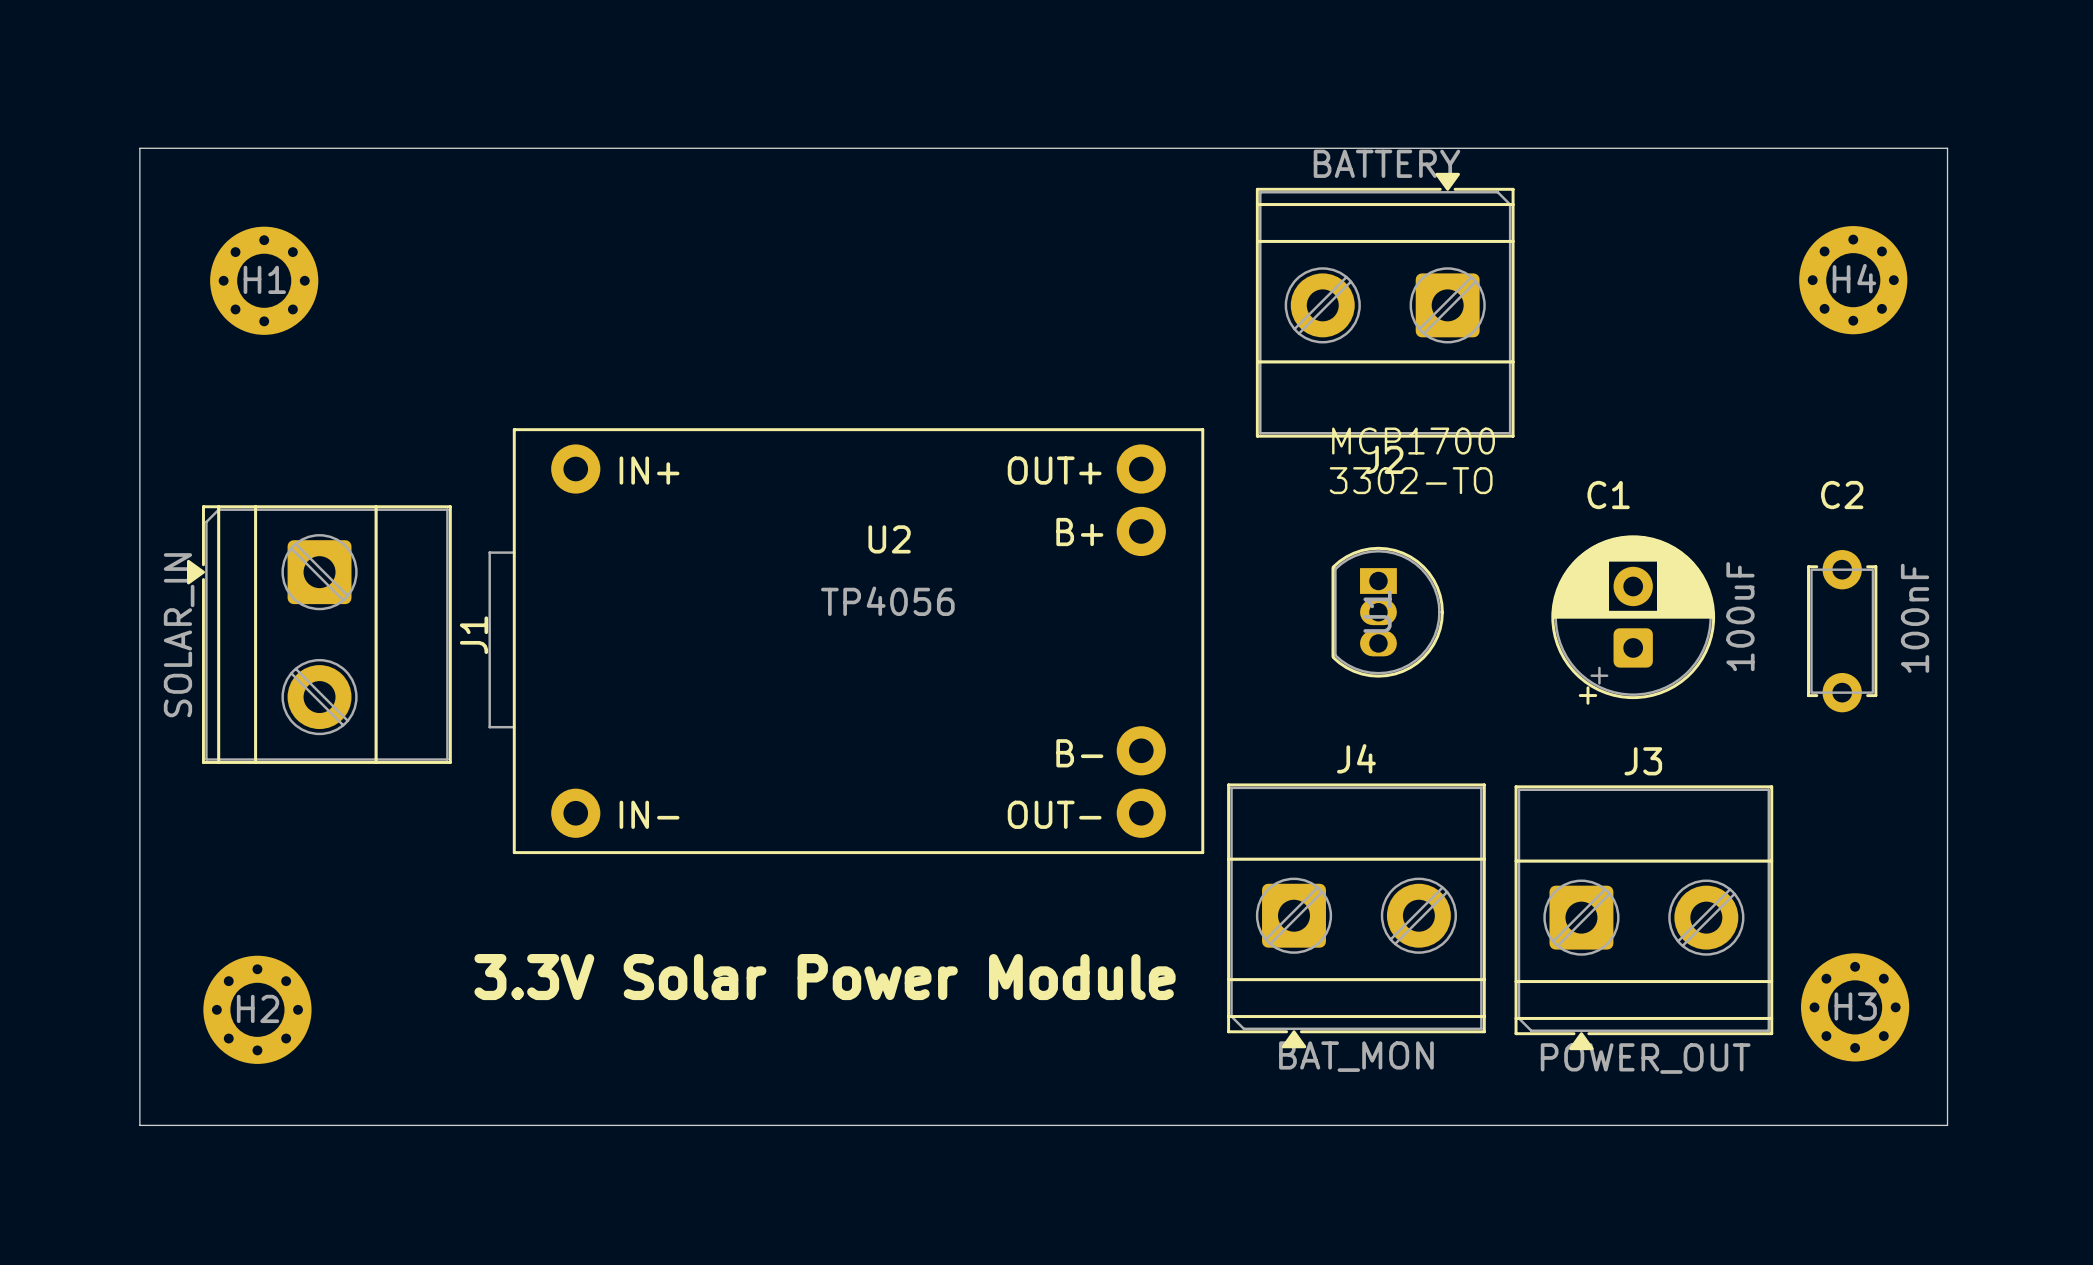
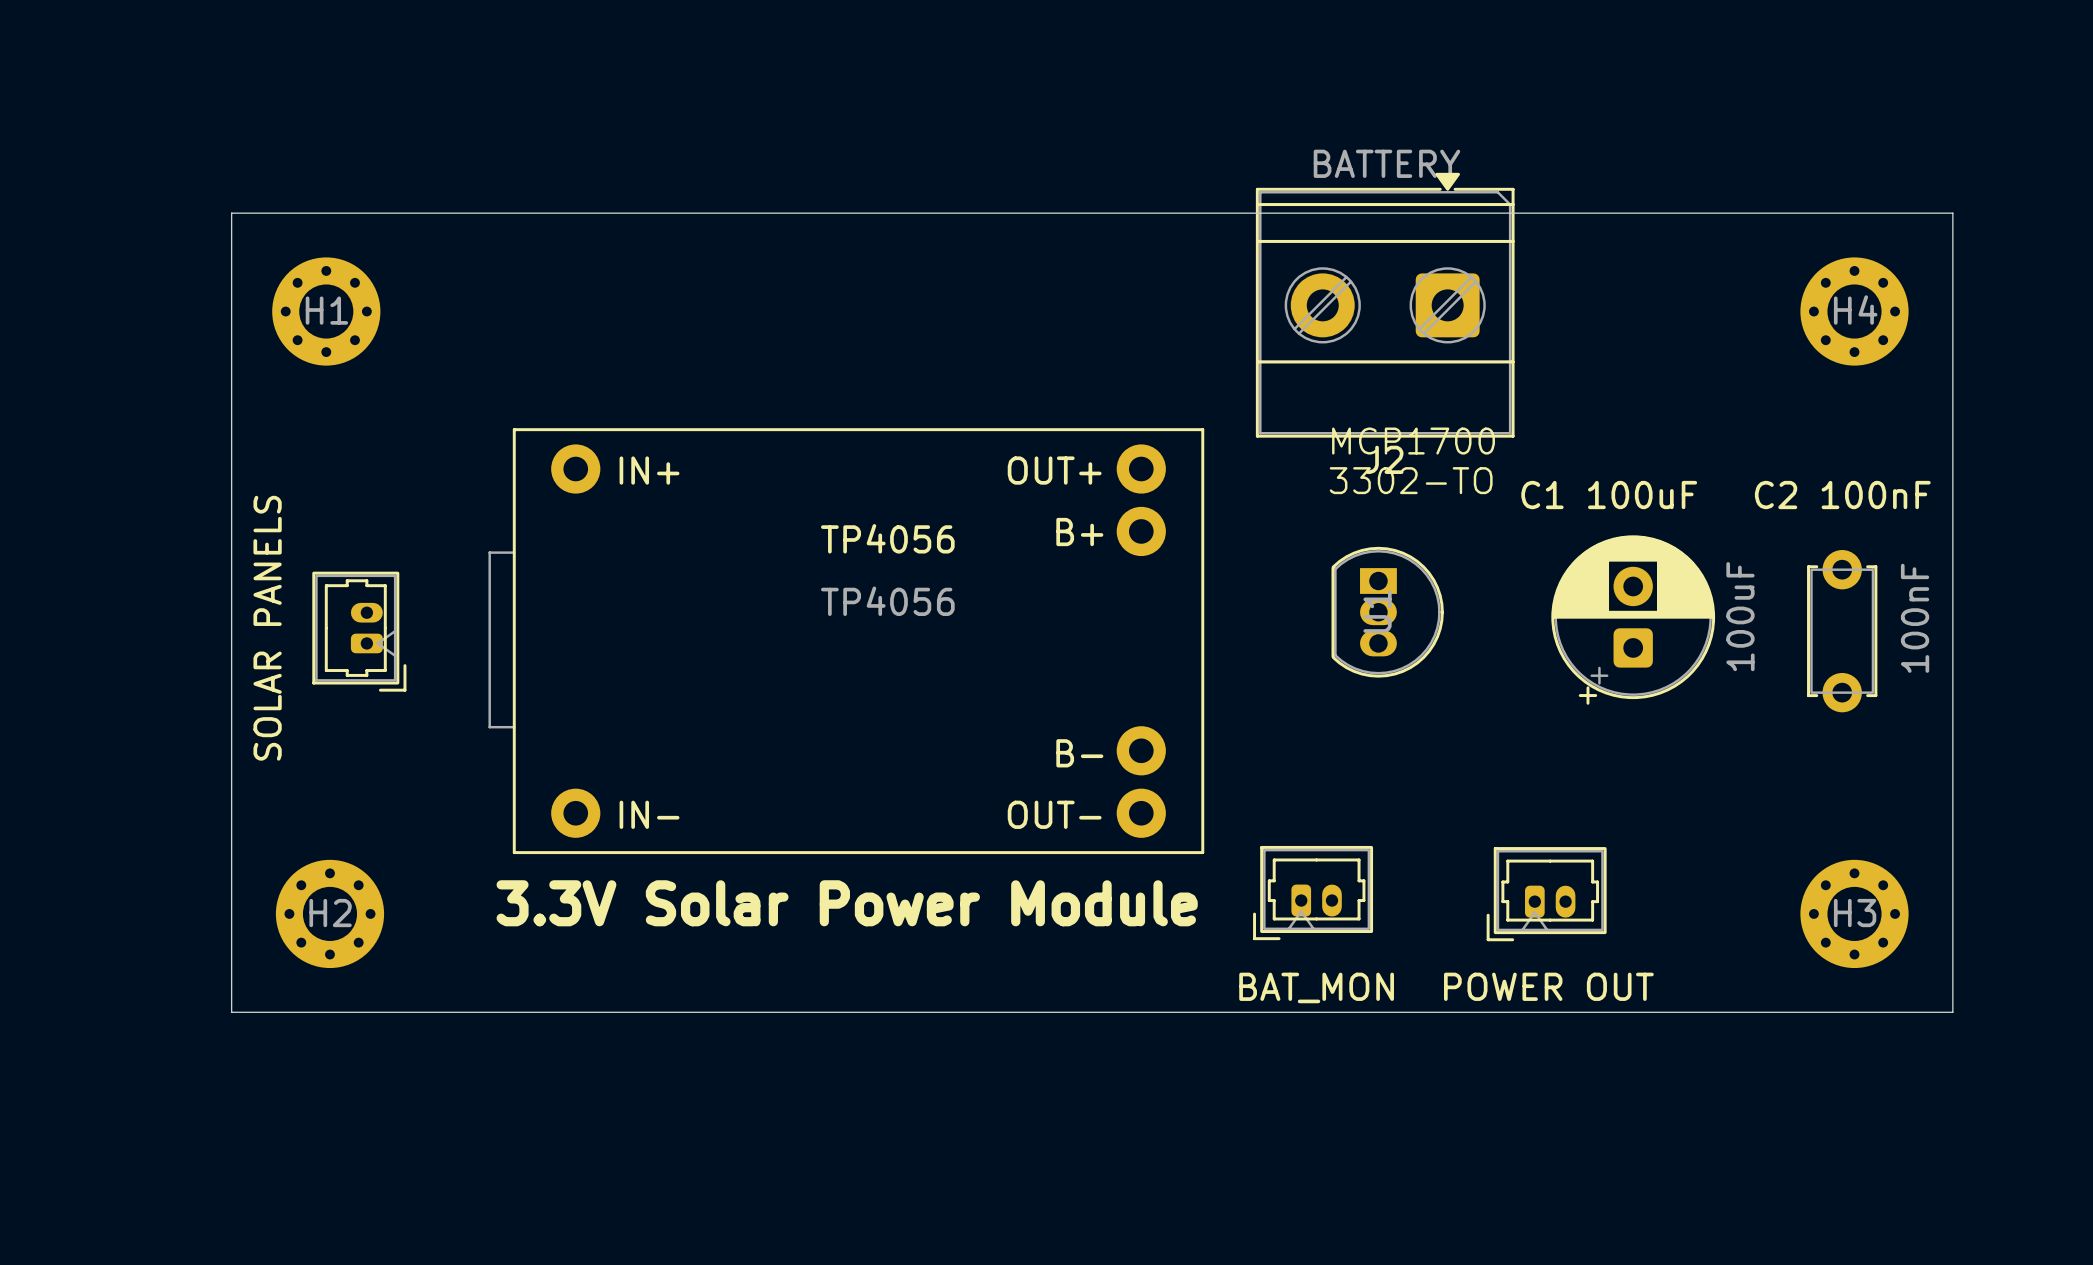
board edge: (139, 148) (1947, 148) (1947, 1125) (139, 1125) (139, 148) -> (231, 213) (231, 1012) (1952, 1012) (1952, 213) (231, 213)
H1 position: (264, 280) -> (326, 311)
H4 position: (1853, 280) -> (1854, 311)
C1 name: C1 (1608, 495) -> C1 100uF (1609, 495)
C2 name: C2 (1842, 495) -> C2 100nF (1842, 495)
U2 name: U2 (889, 539) -> TP4056 (887, 538)
SOLAR PANELS: none -> (359, 631)
J1: SOLAR_IN (319, 634) -> none
BAT_MON: none -> (1313, 893)
POWER OUT: none -> (1546, 894)
J4: BAT_MON (1356, 915) -> none
J3: POWER_OUT (1643, 917) -> none
text position: 3.3V Solar Power Module (825, 977) -> 3.3V Solar Power Module (847, 903)
H3 position: (1855, 1007) -> (1854, 913)
H2 position: (257, 1009) -> (329, 913)

